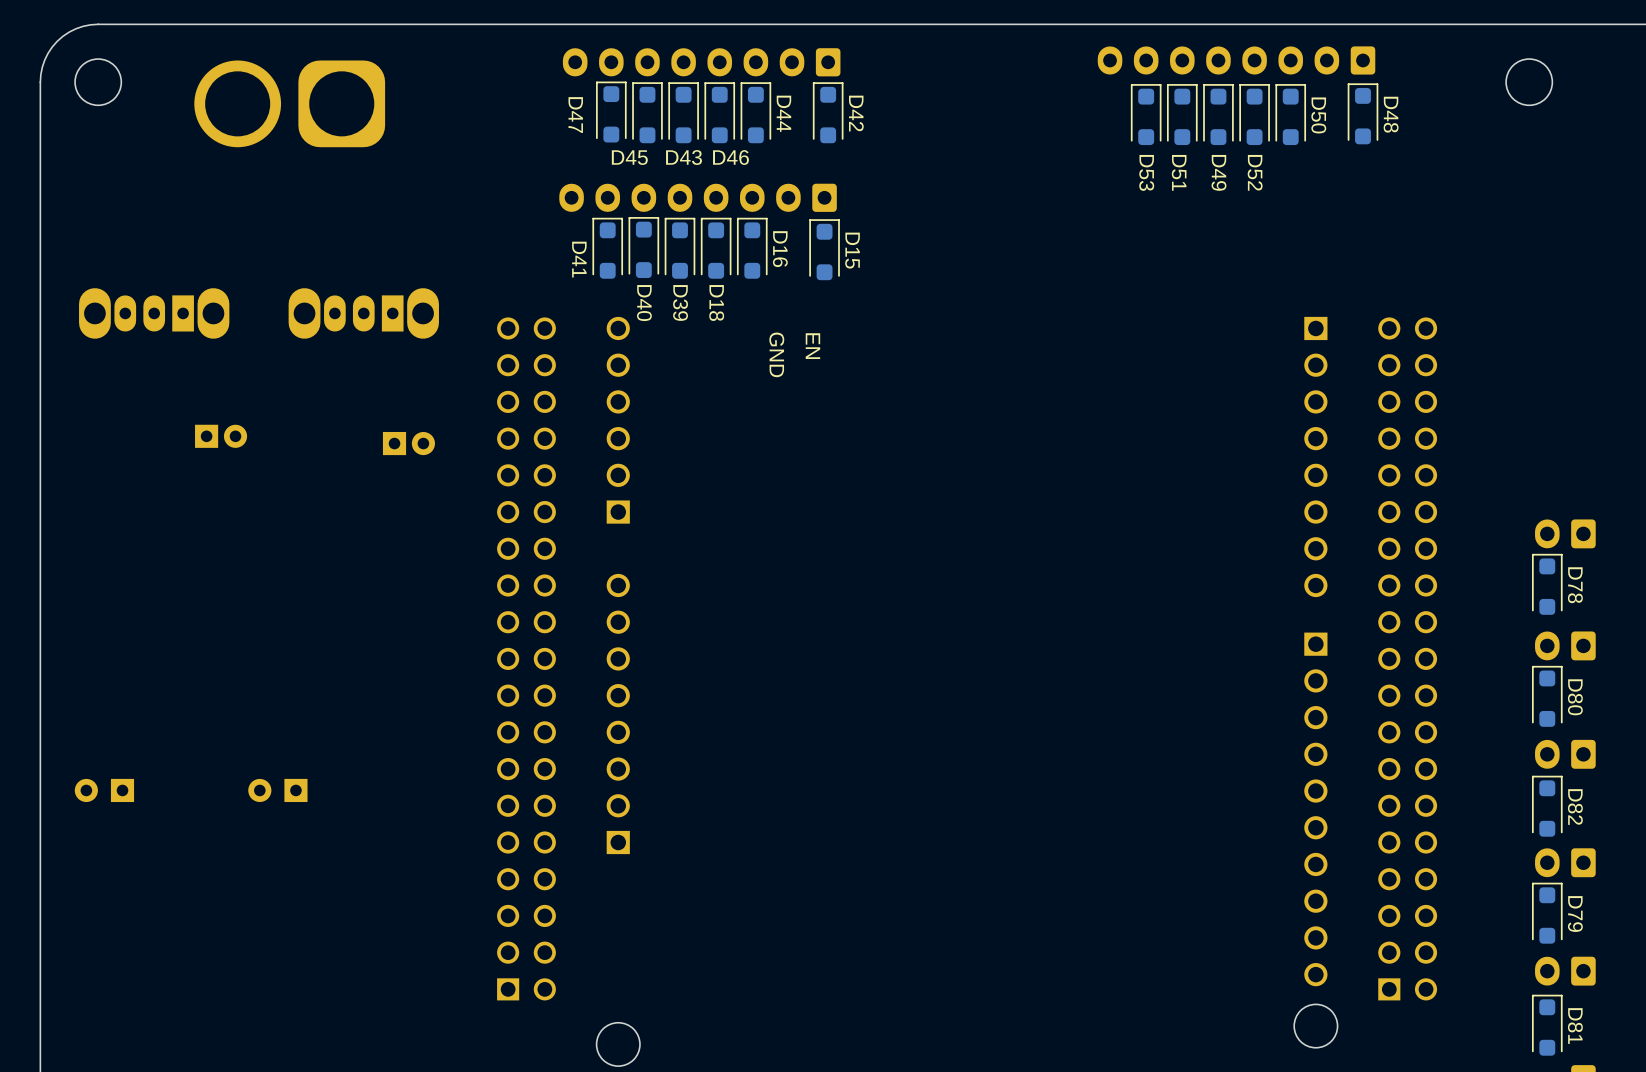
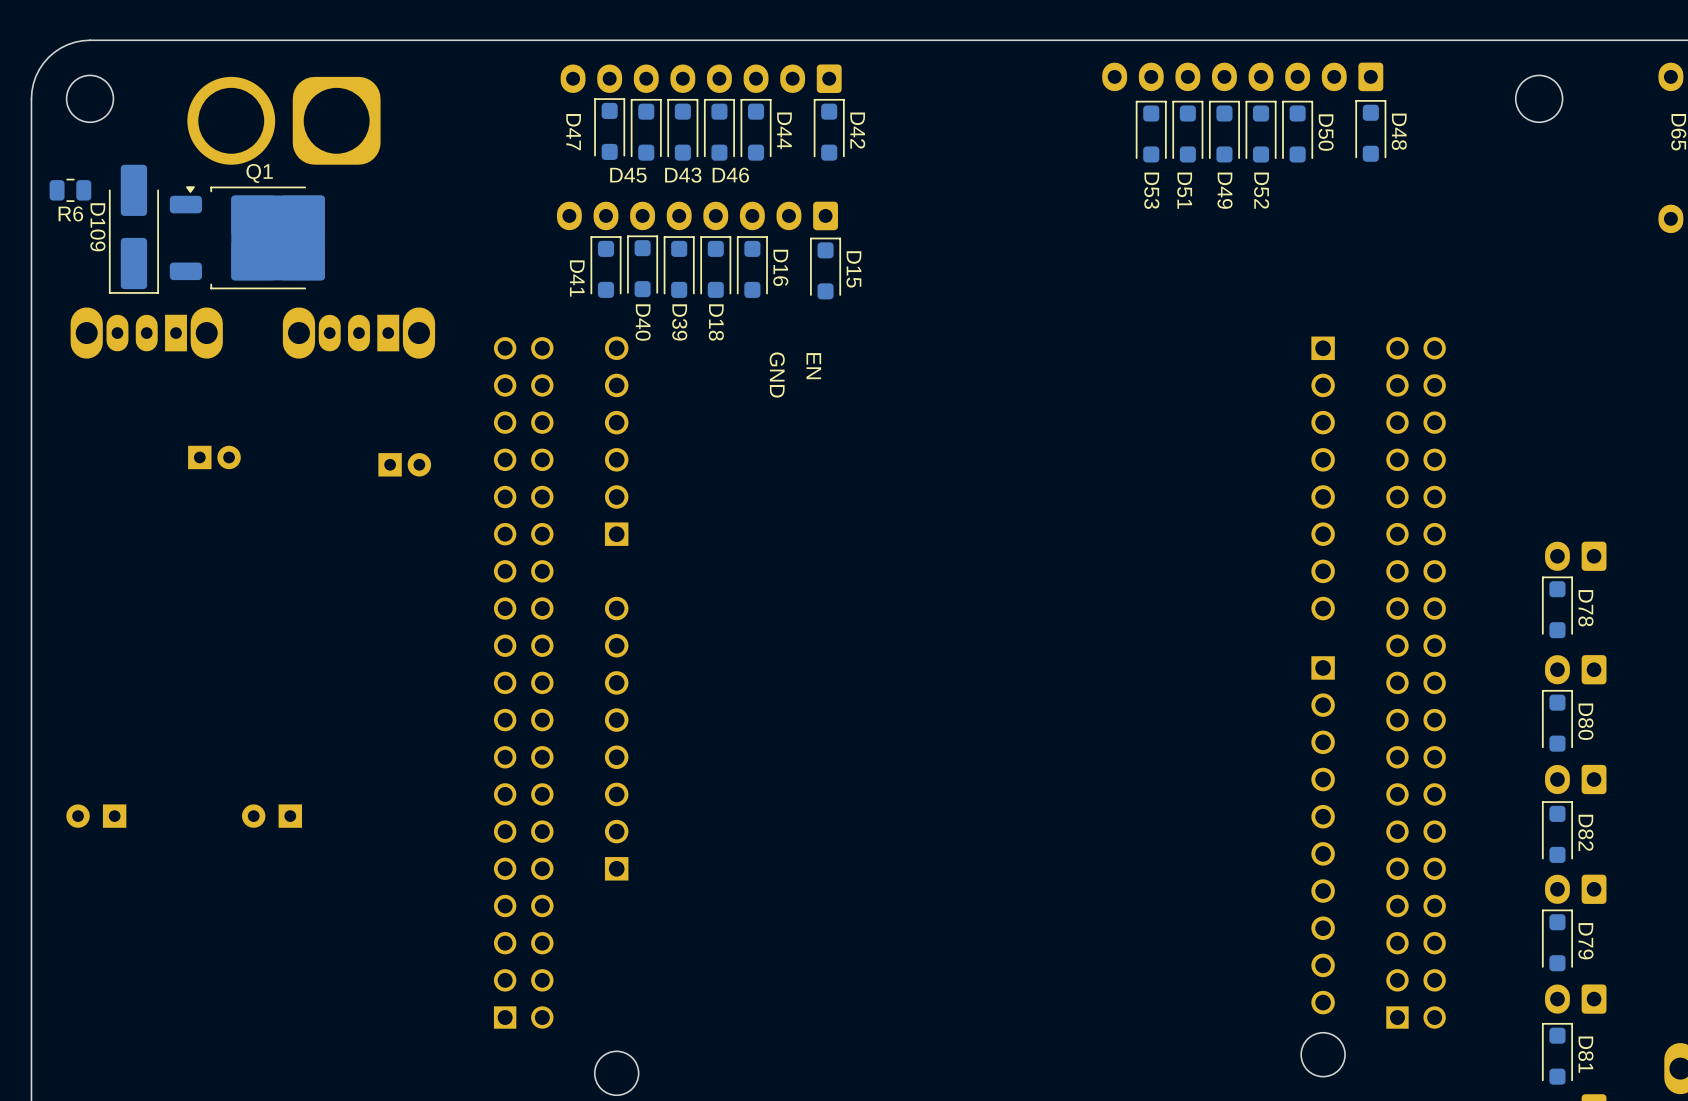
R6: none -> (70, 190)
D109: none -> (133, 229)
Q1: none -> (247, 237)

